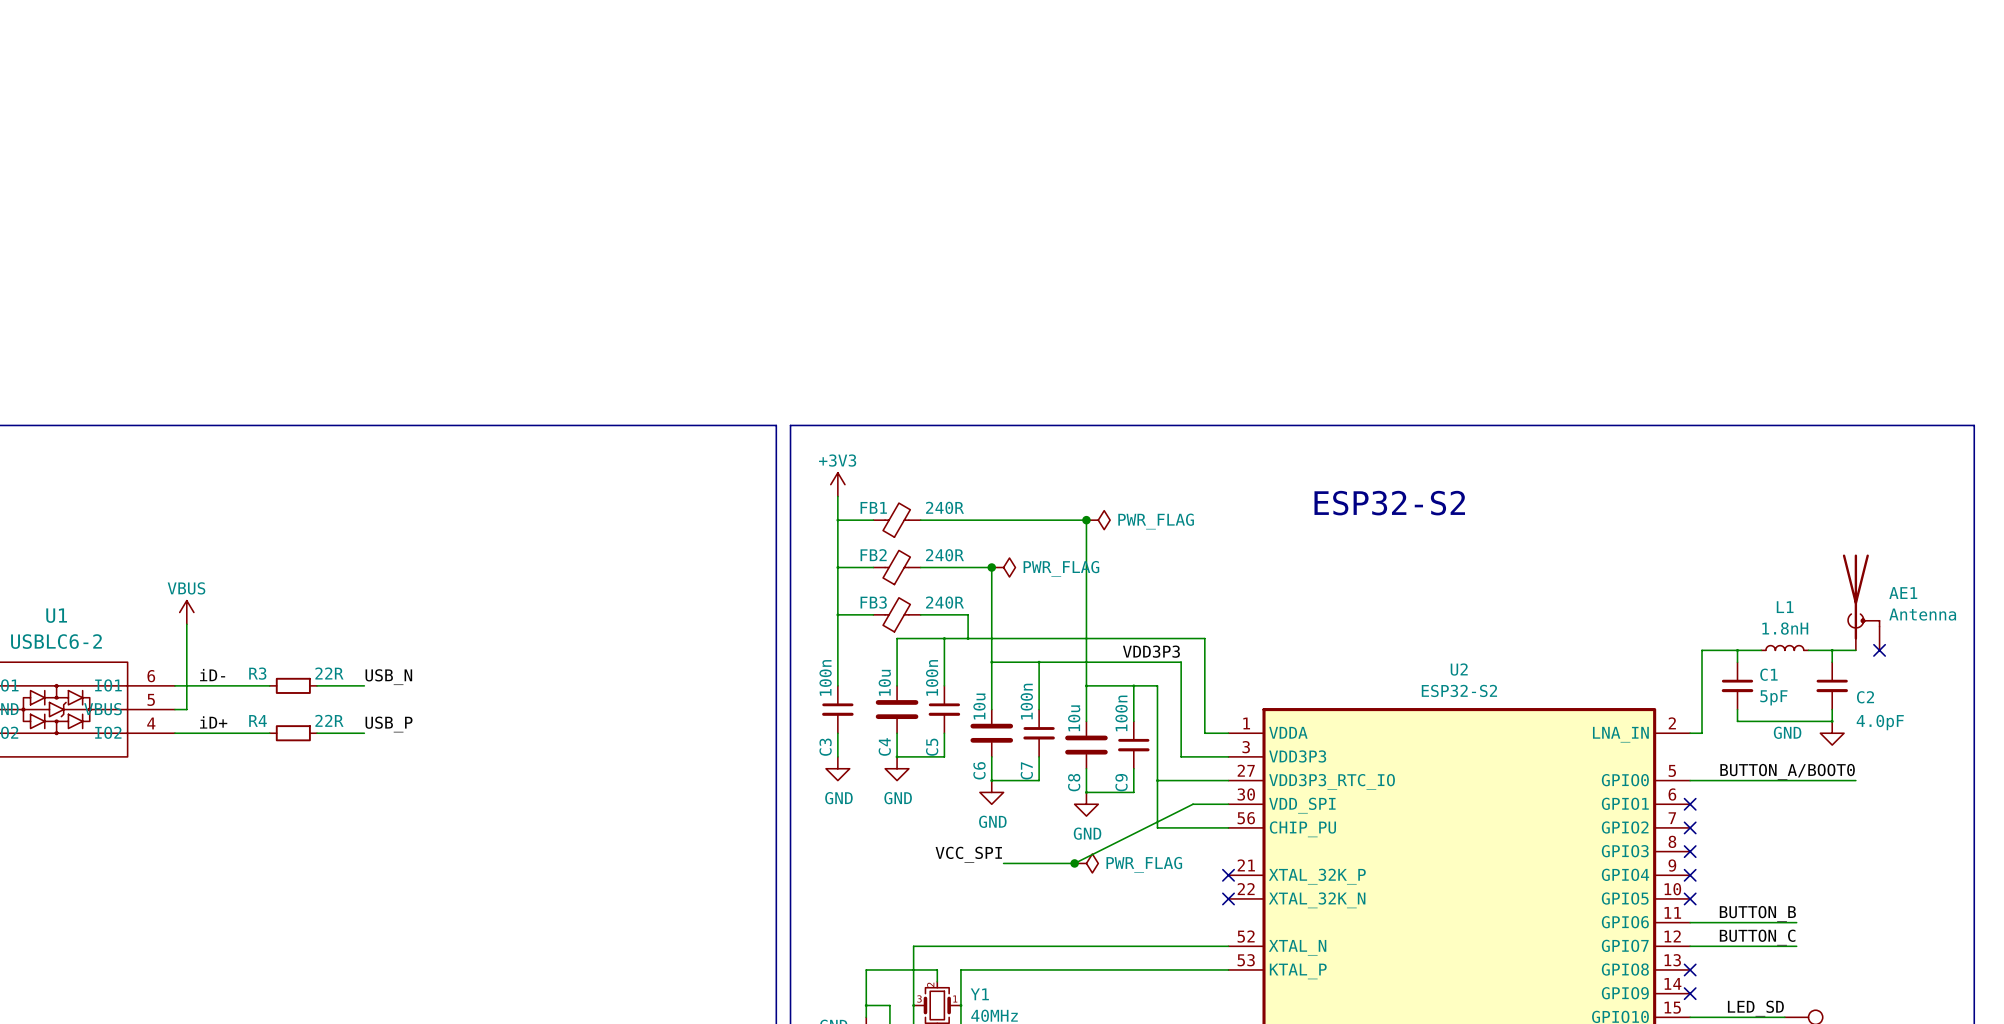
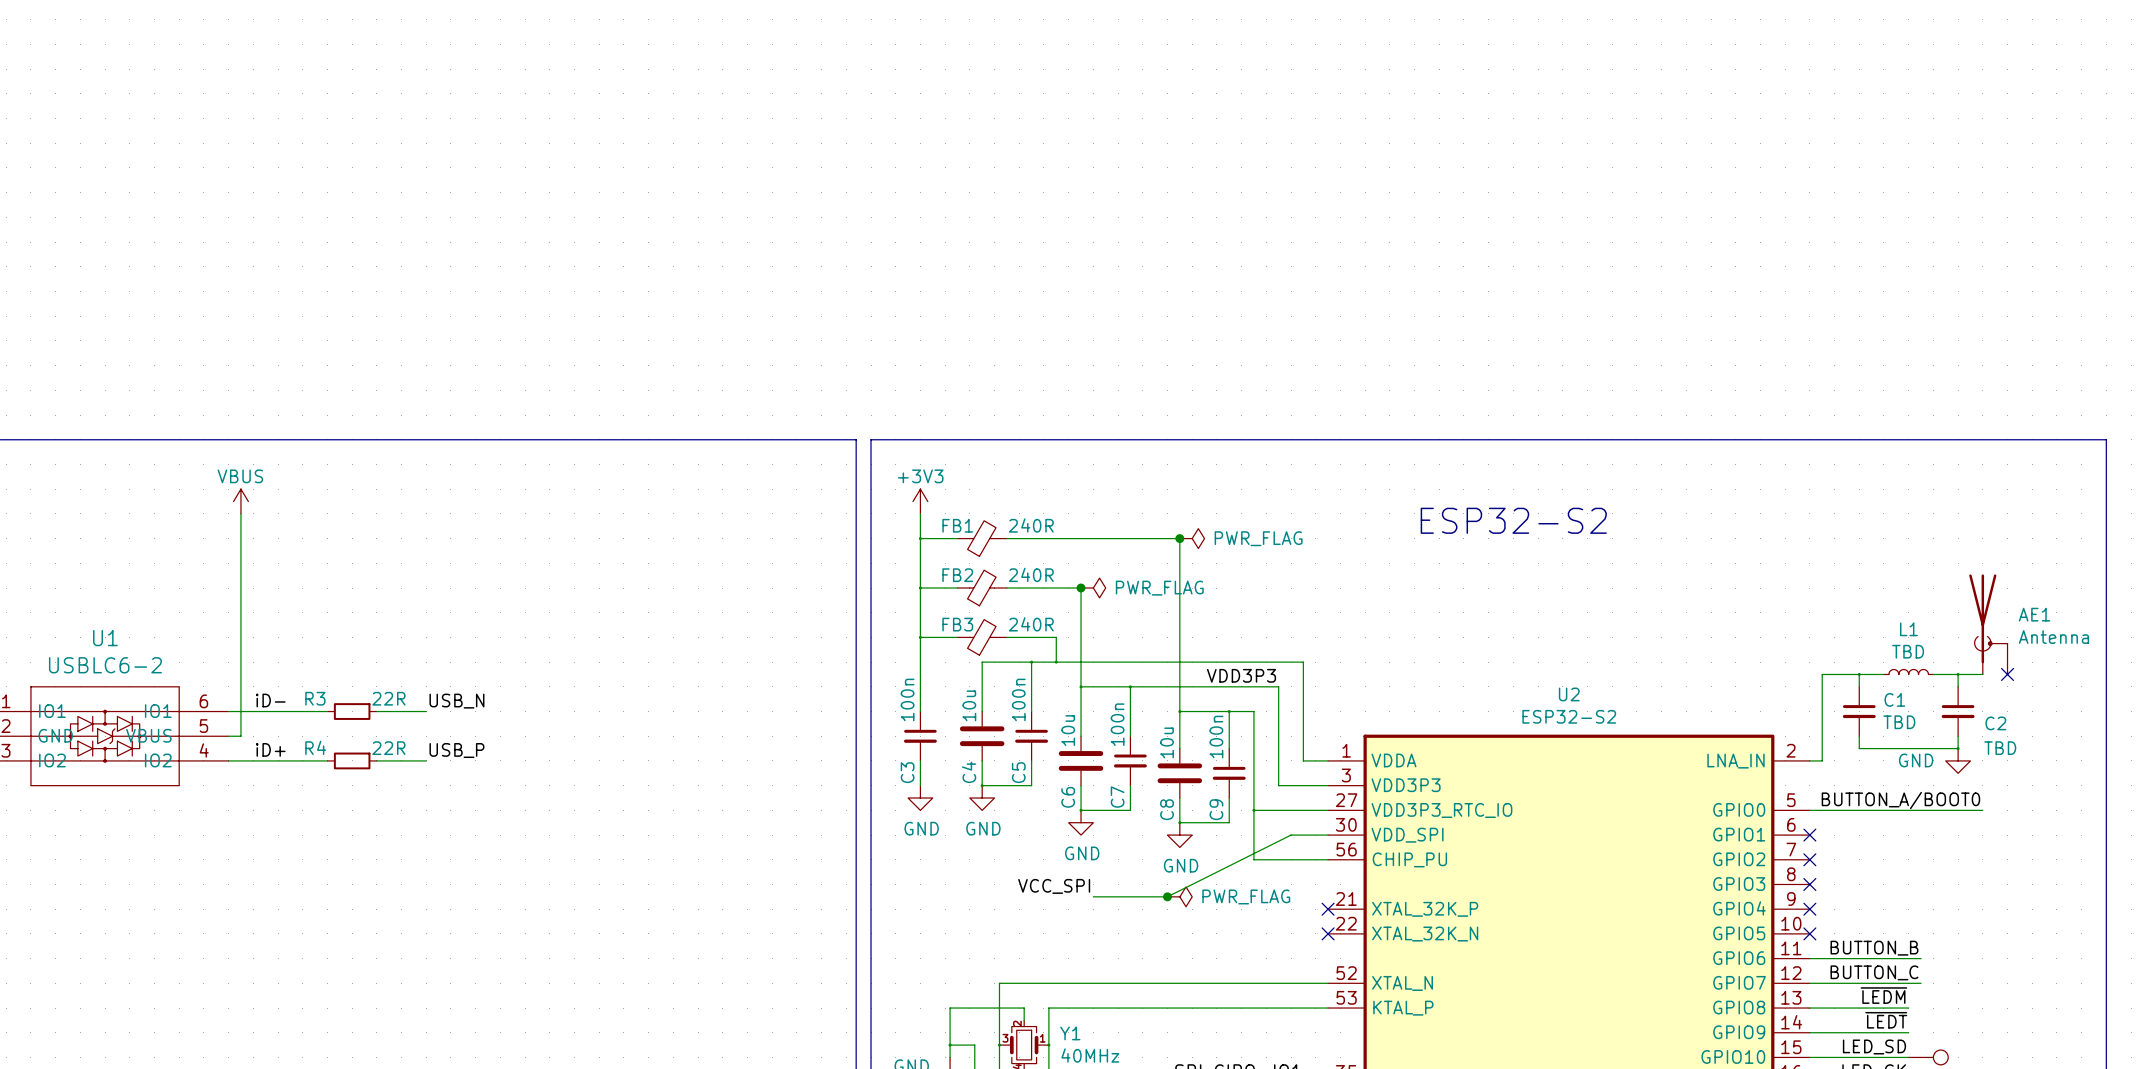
wire: none -> (240, 513) (240, 647)
power symbol position: VBUS (186, 612) -> VBUS (240, 501)
L1 value: 1.8nH (1785, 628) -> TBD (1908, 651)
C1 value: 5pF (1773, 697) -> TBD (1899, 722)
C2 value: 4.0pF (1880, 722) -> TBD (2000, 748)
label: none -> ~{LEDM} (1883, 995)
wire: none -> (1809, 1008) (1908, 1008)
no-connect mark: (1690, 969) -> none
label: none -> ~{LEDT} (1886, 1020)
wire: none -> (1809, 1032) (1908, 1032)
no-connect mark: (1690, 993) -> none

